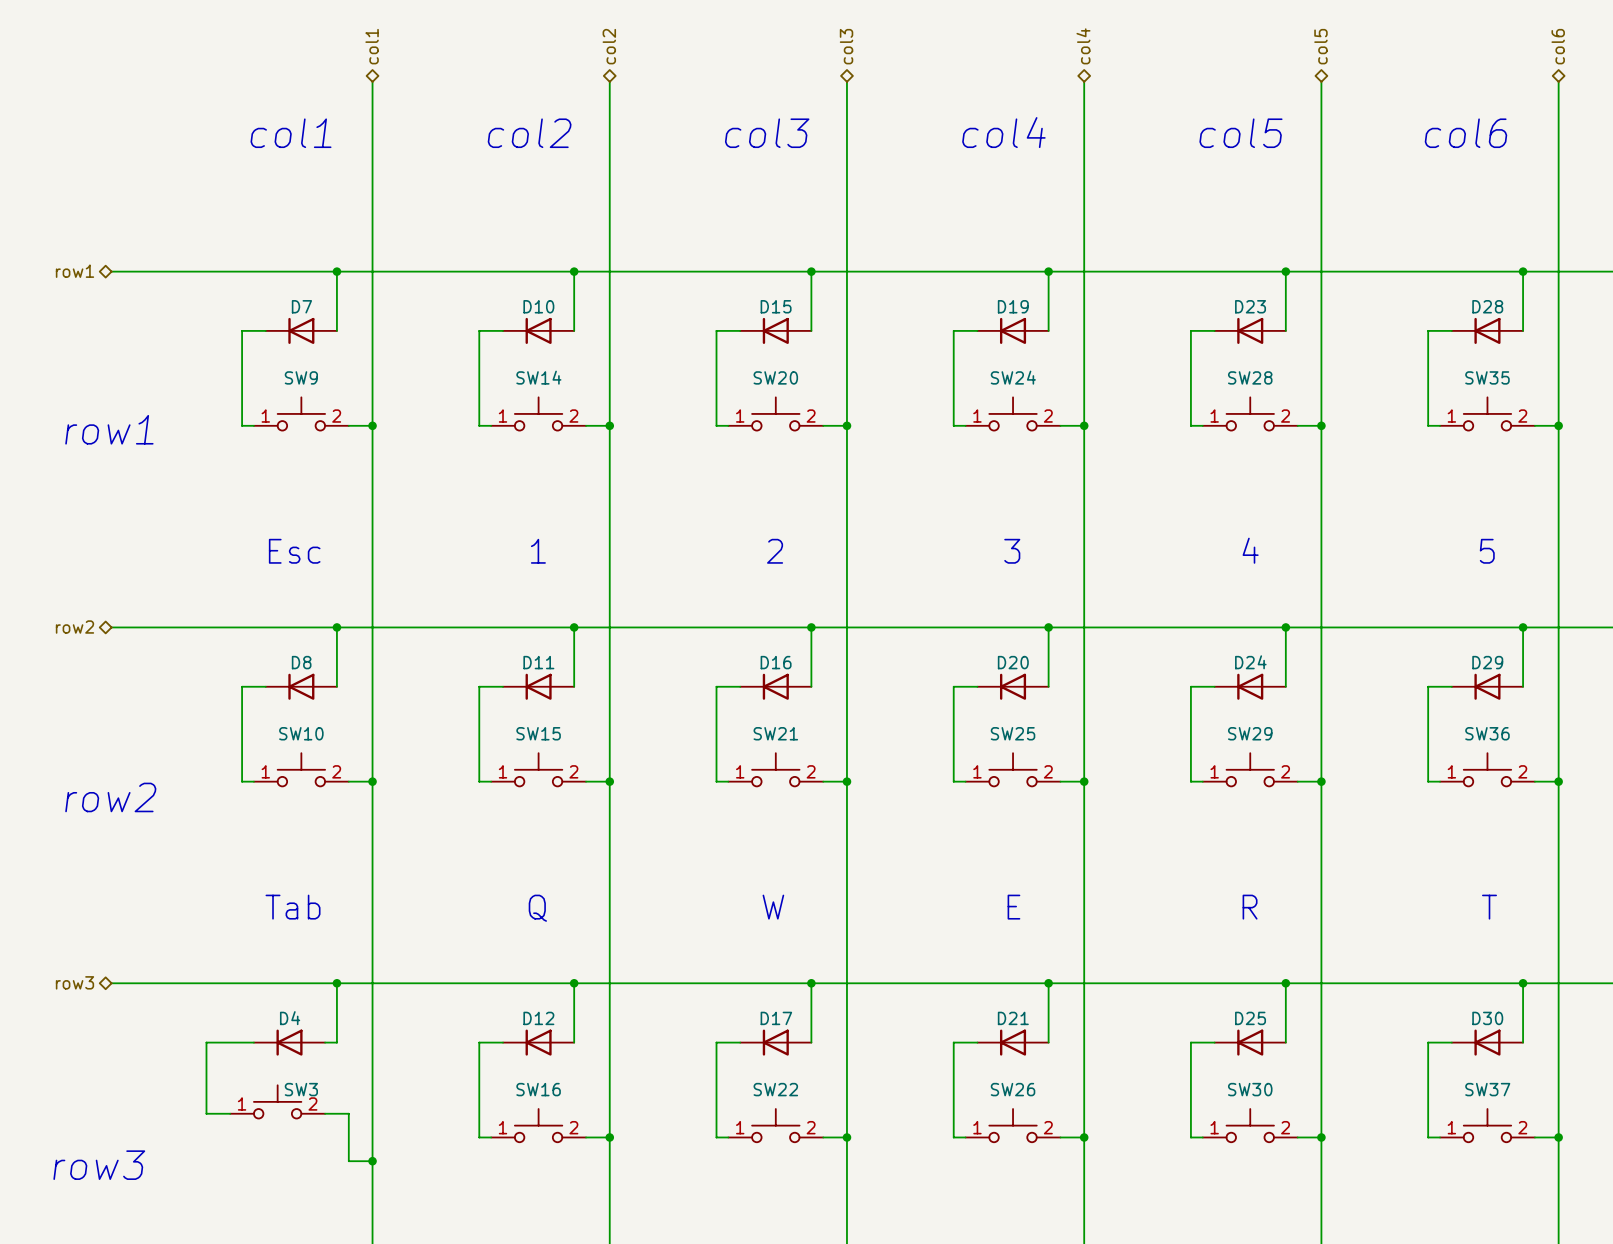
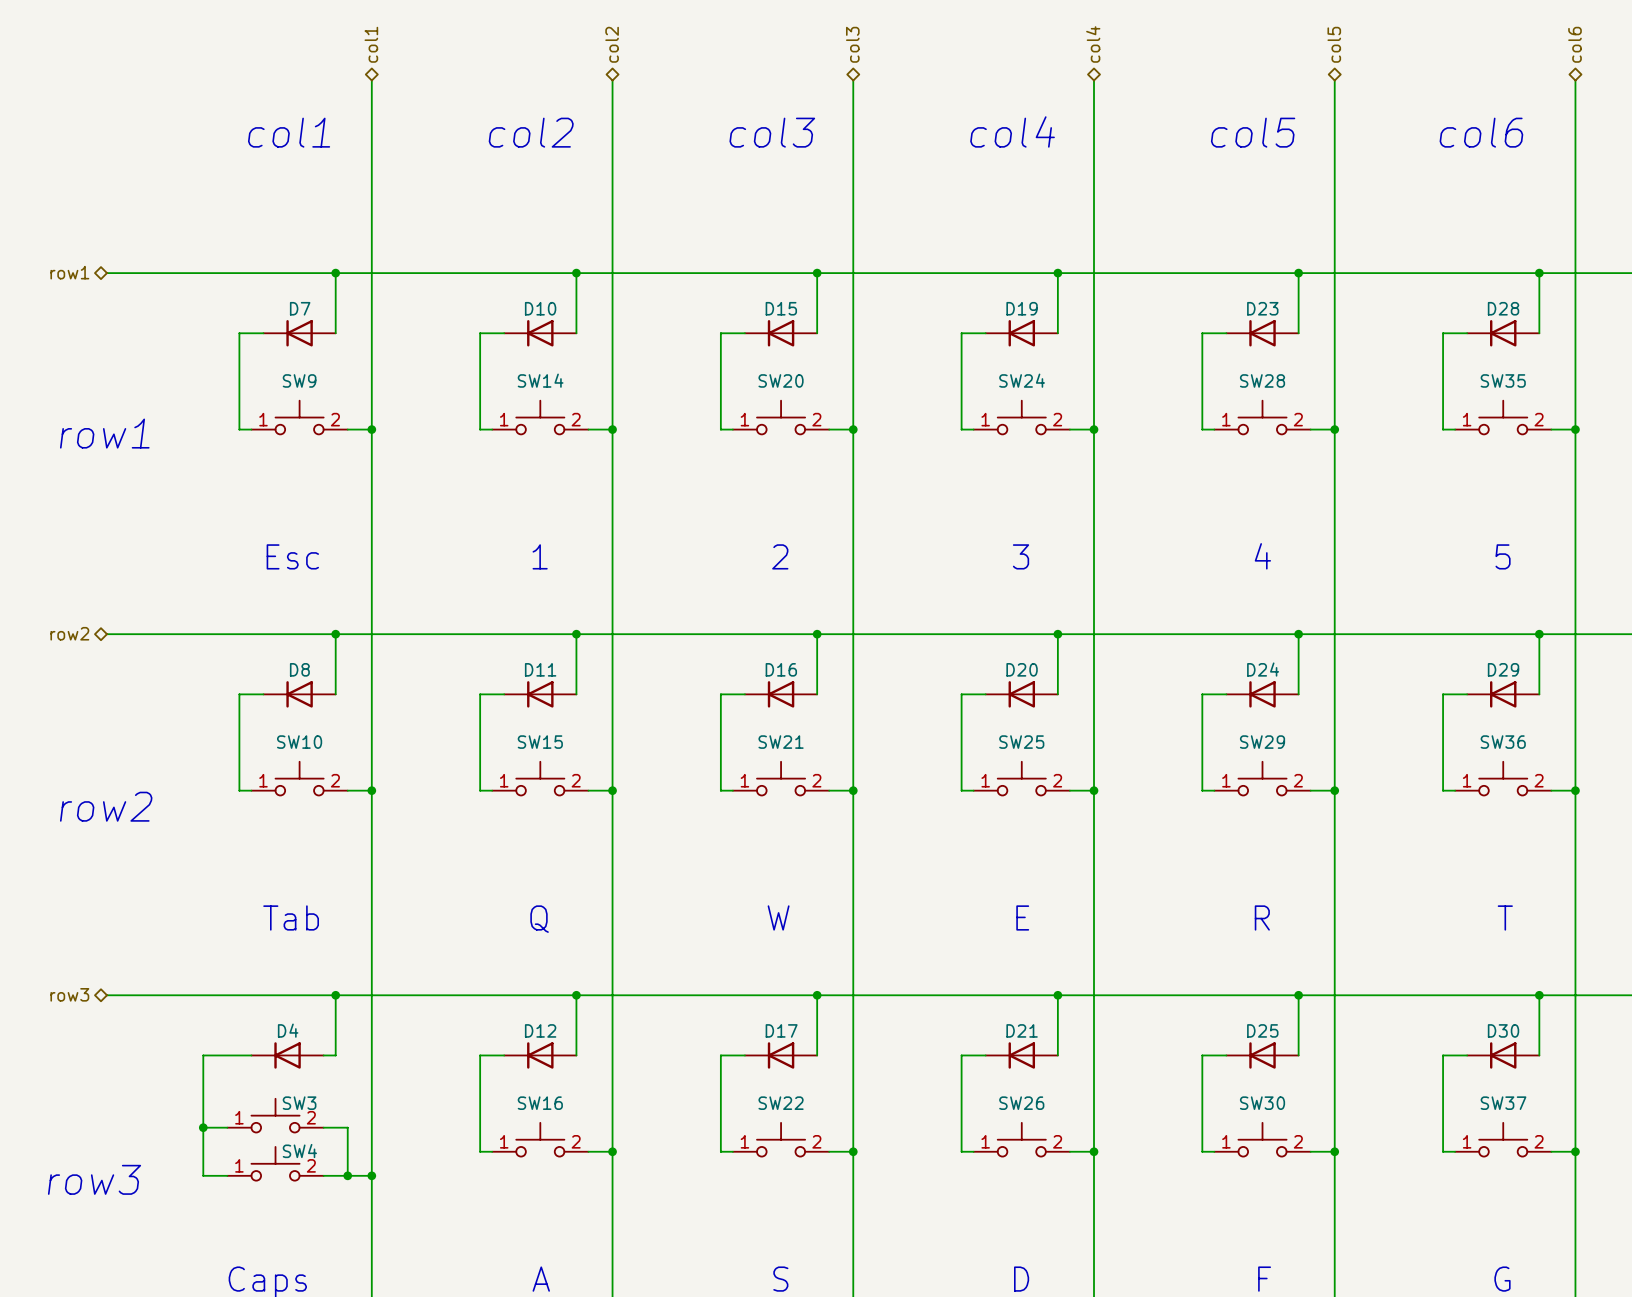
wire: none -> (203, 1127) (203, 1175) (227, 1175)
junction: none -> (203, 1127)
SW4: none -> (275, 1163)
wire: none -> (323, 1175) (347, 1175)
junction: none -> (347, 1175)

